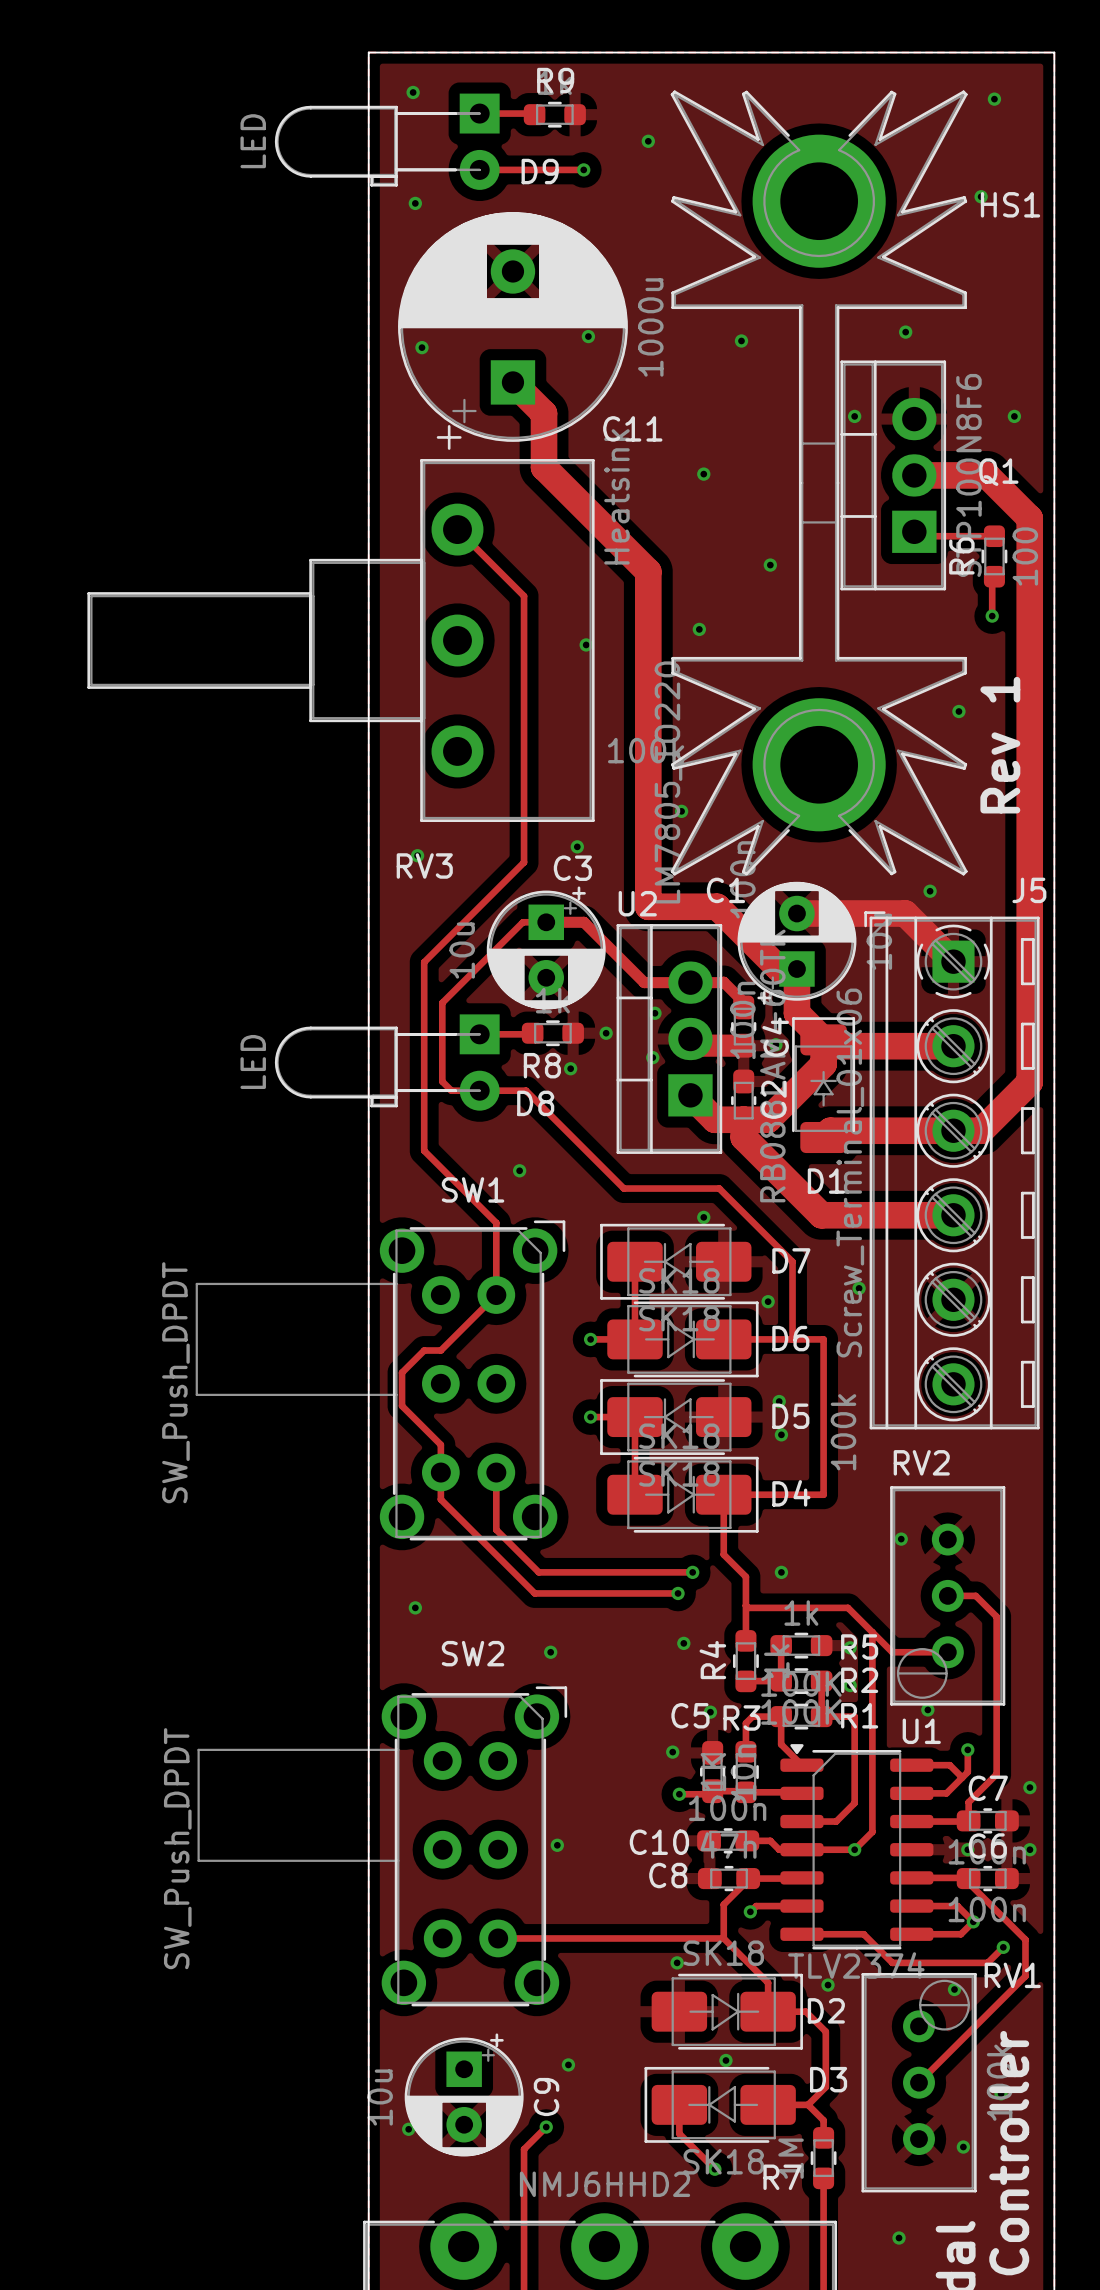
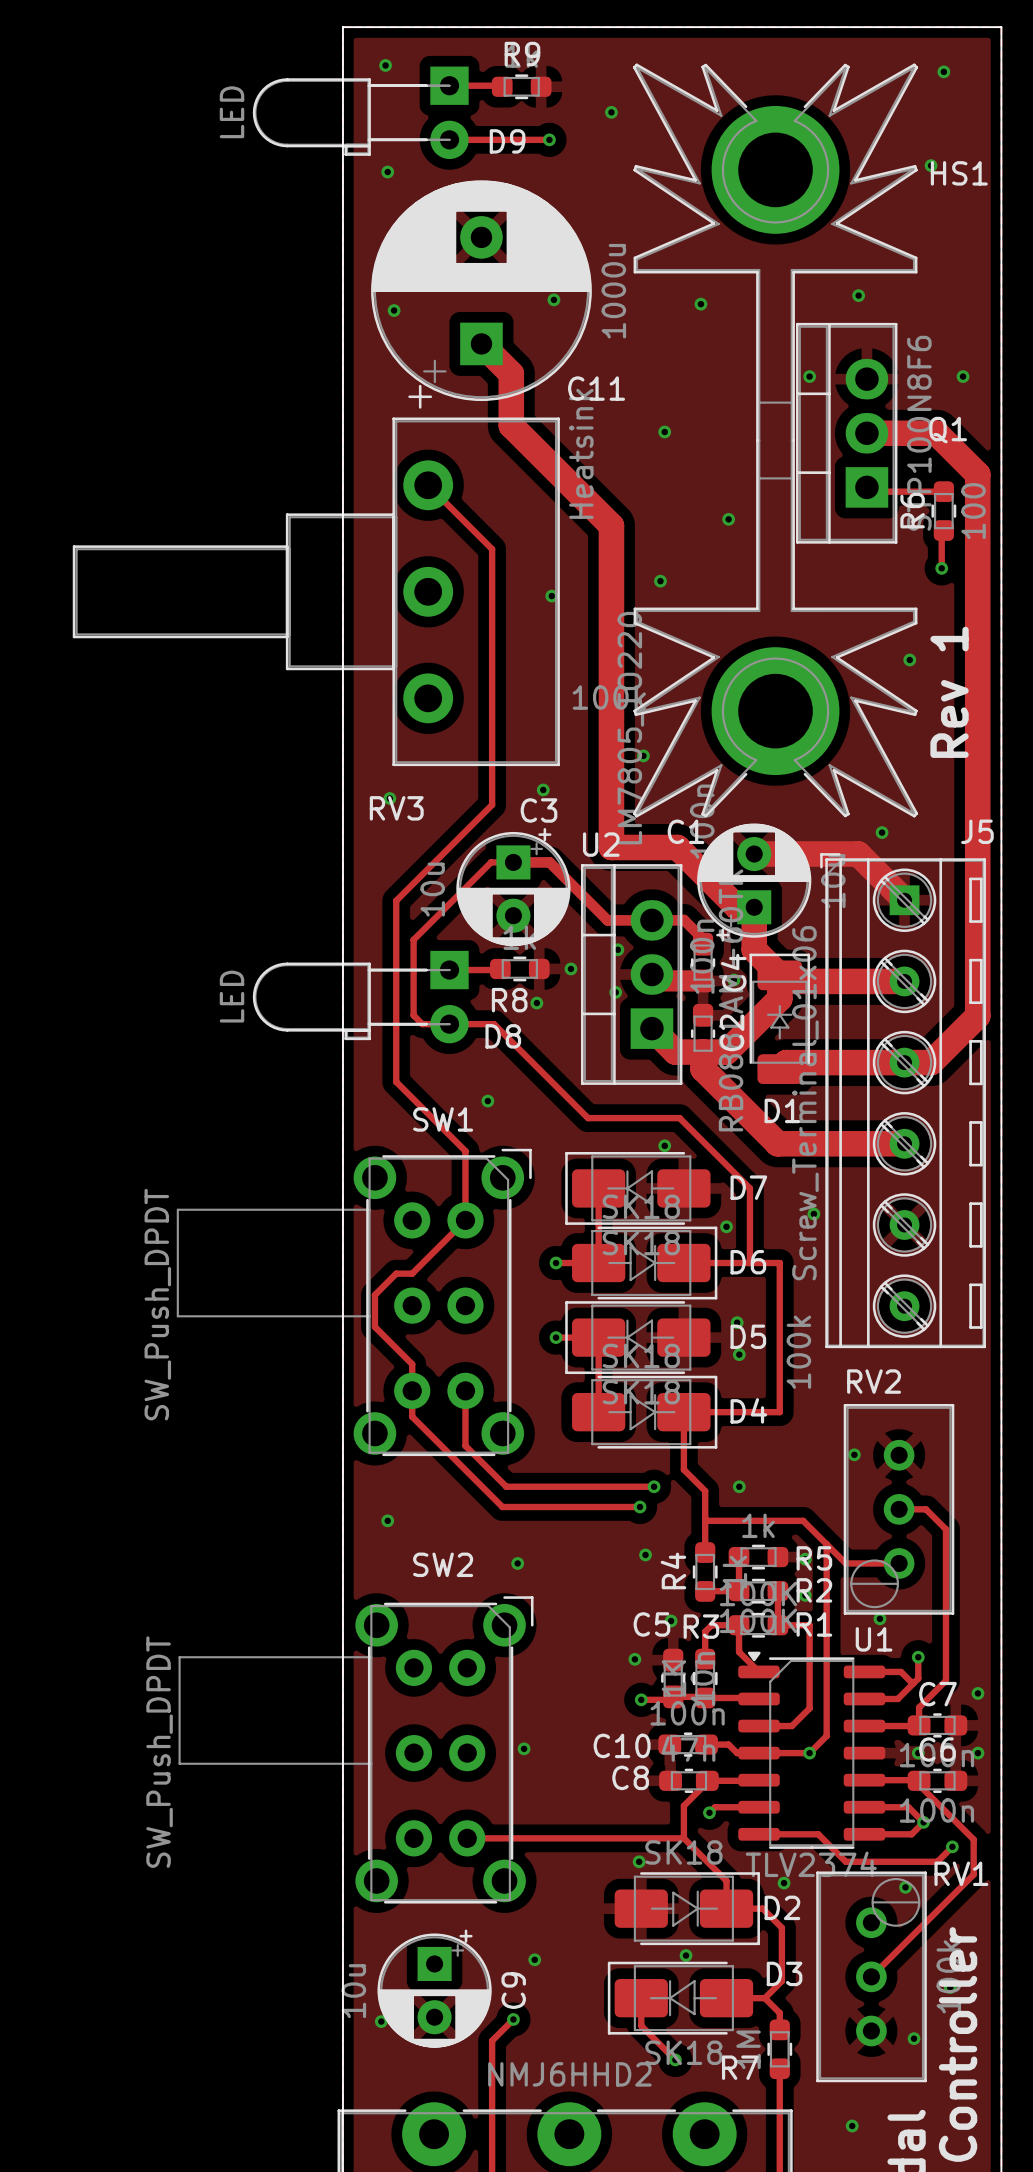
J5 footprint: [864, 911, 1040, 1430] -> [820, 853, 986, 1349]

